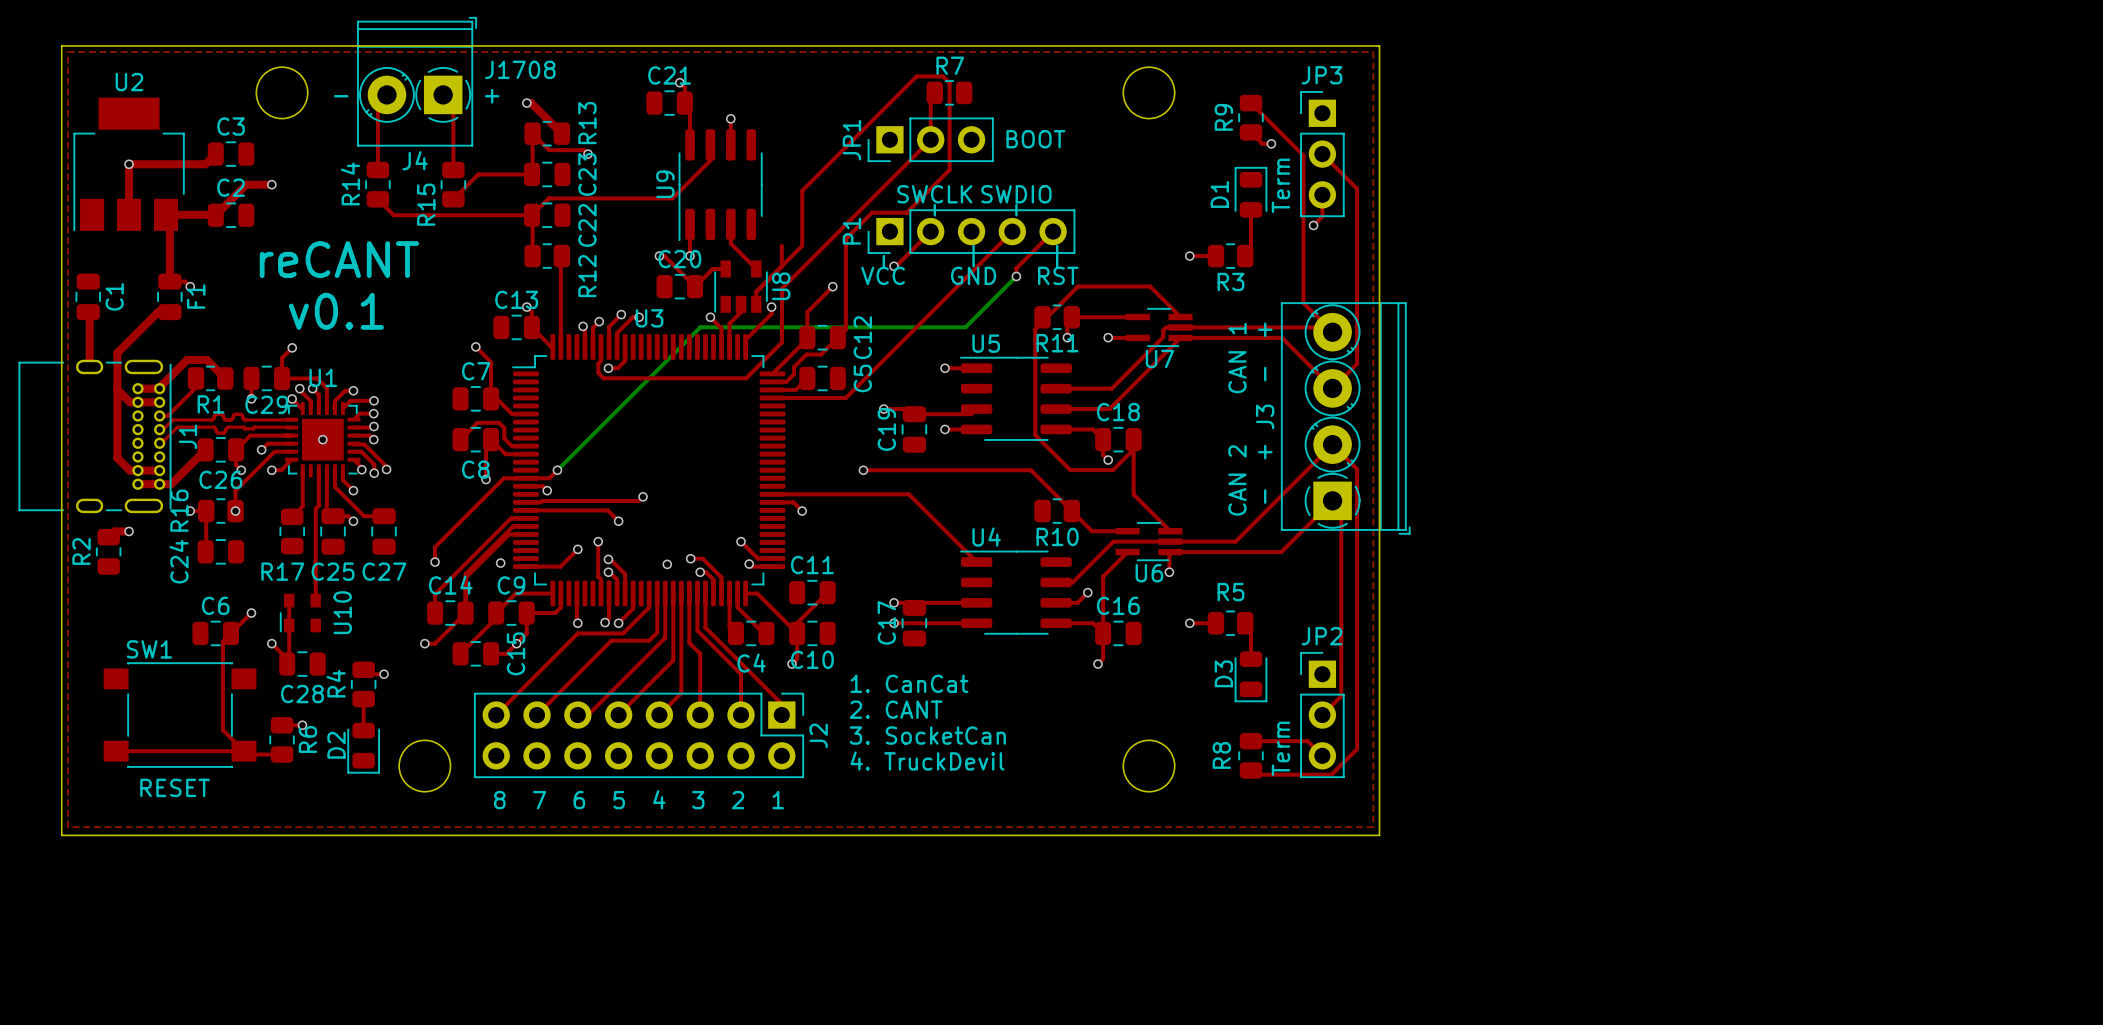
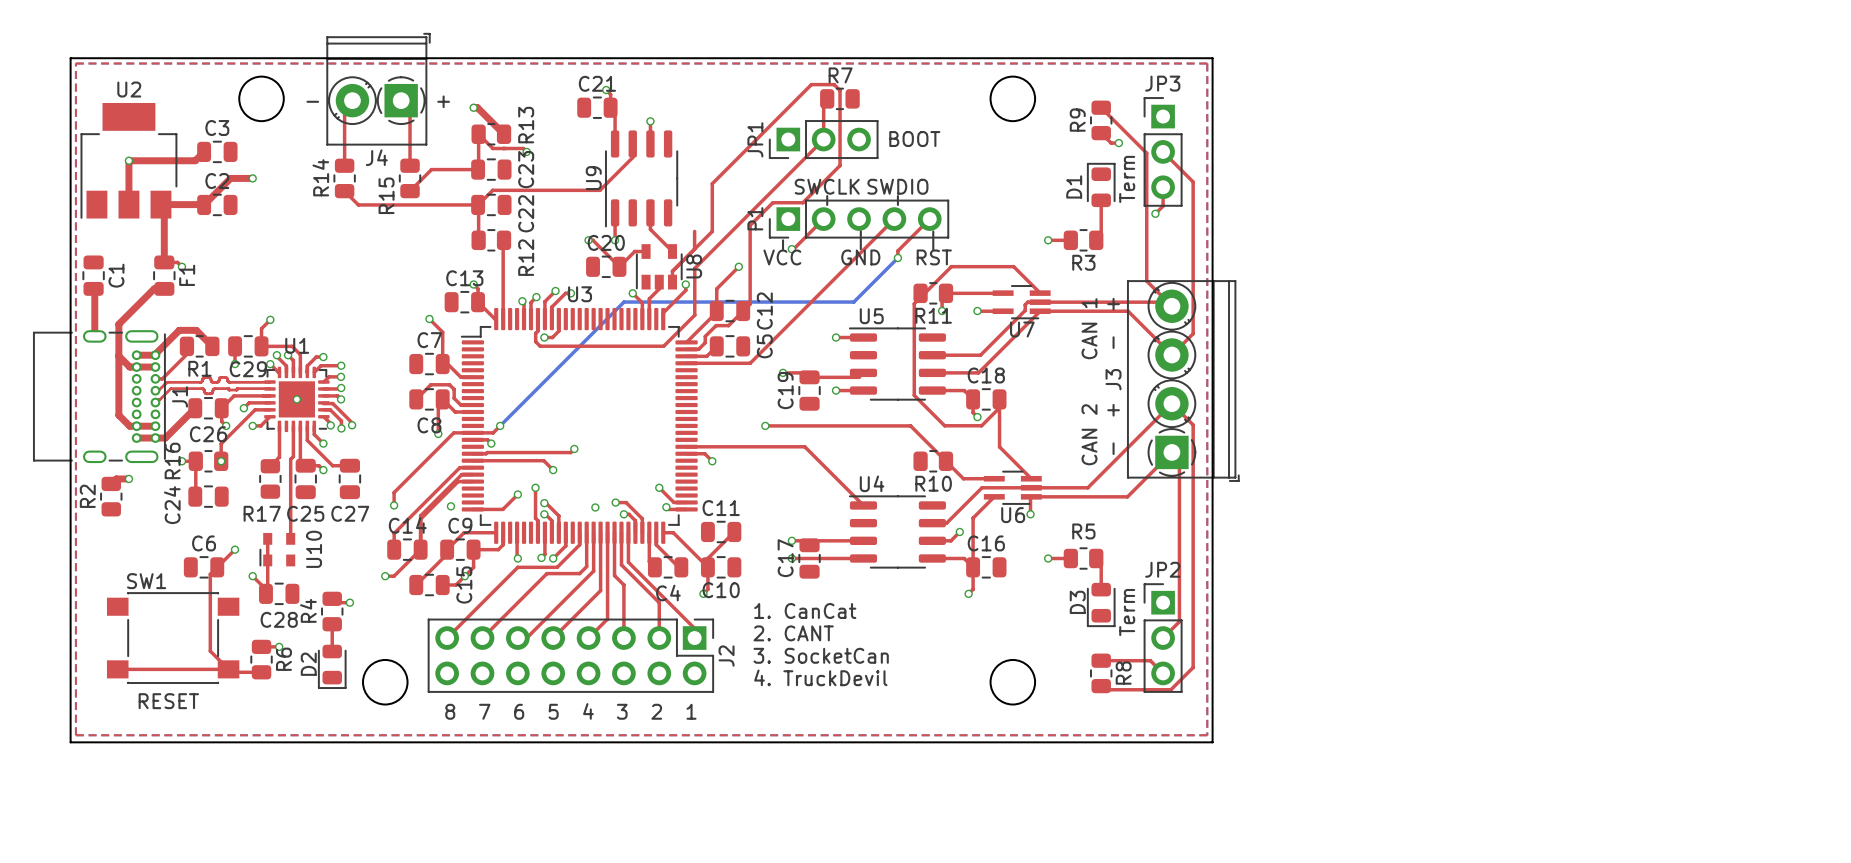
text: J1708 (520, 69) -> none
text: reCANT (339, 259) -> none
text: v0.1 (336, 311) -> none
text position: Term (1280, 748) -> Term (1127, 612)
R8 name position: R8 (1221, 755) -> R8 (1123, 673)

